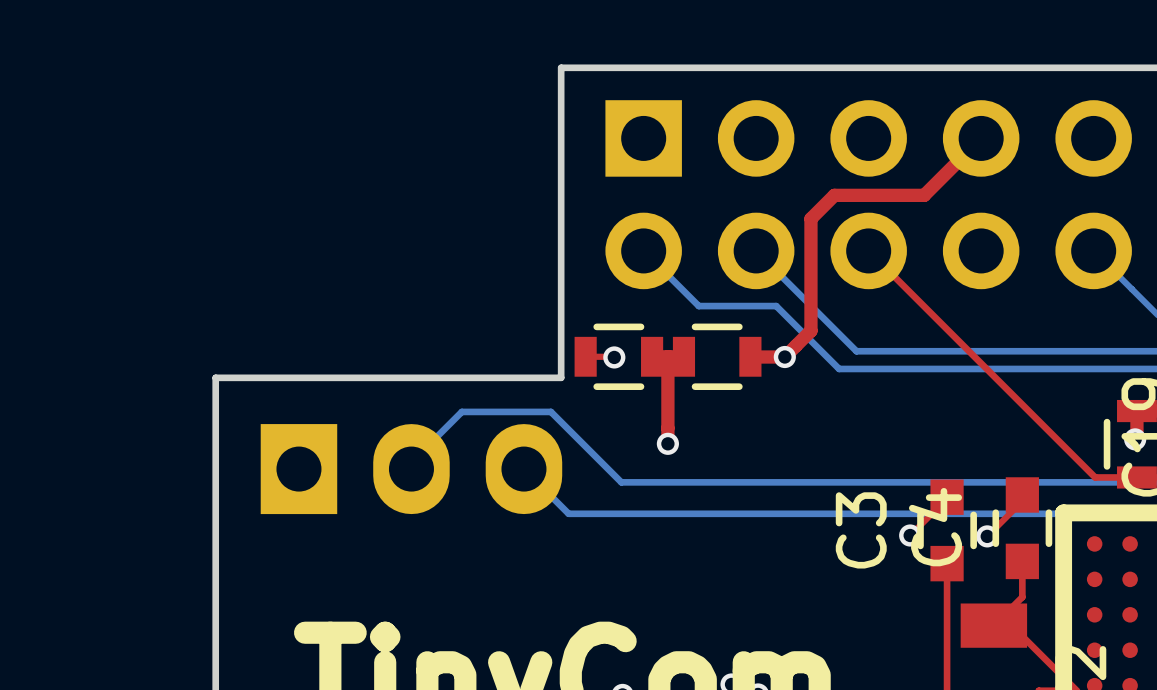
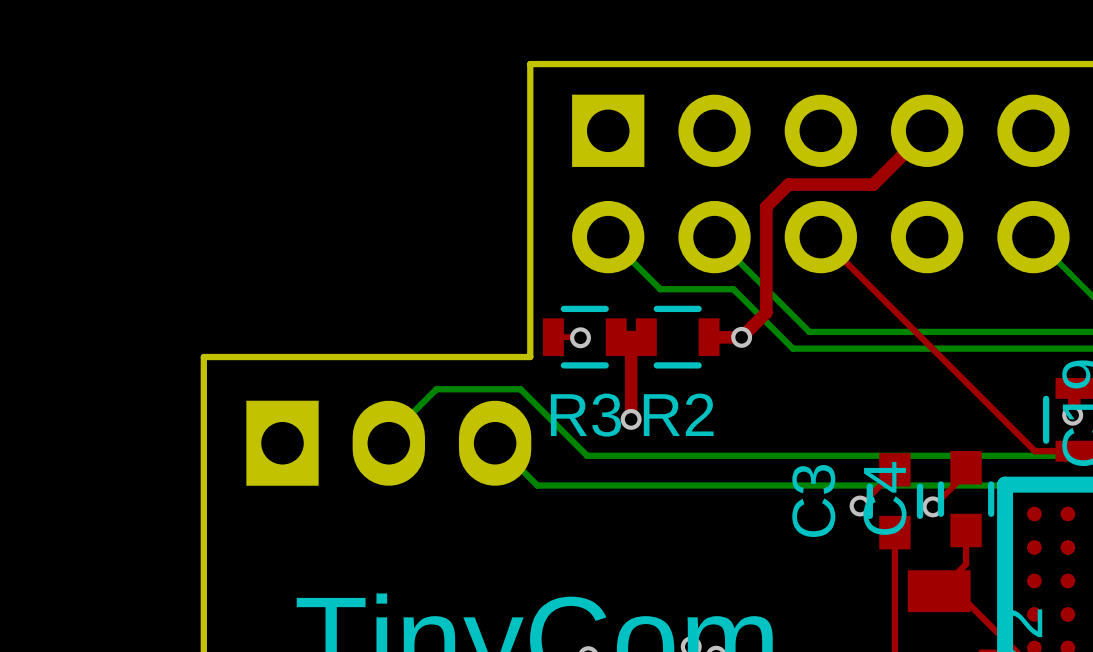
R3 name: none -> R3 (585, 415)
R2 name: none -> R2 (678, 414)

